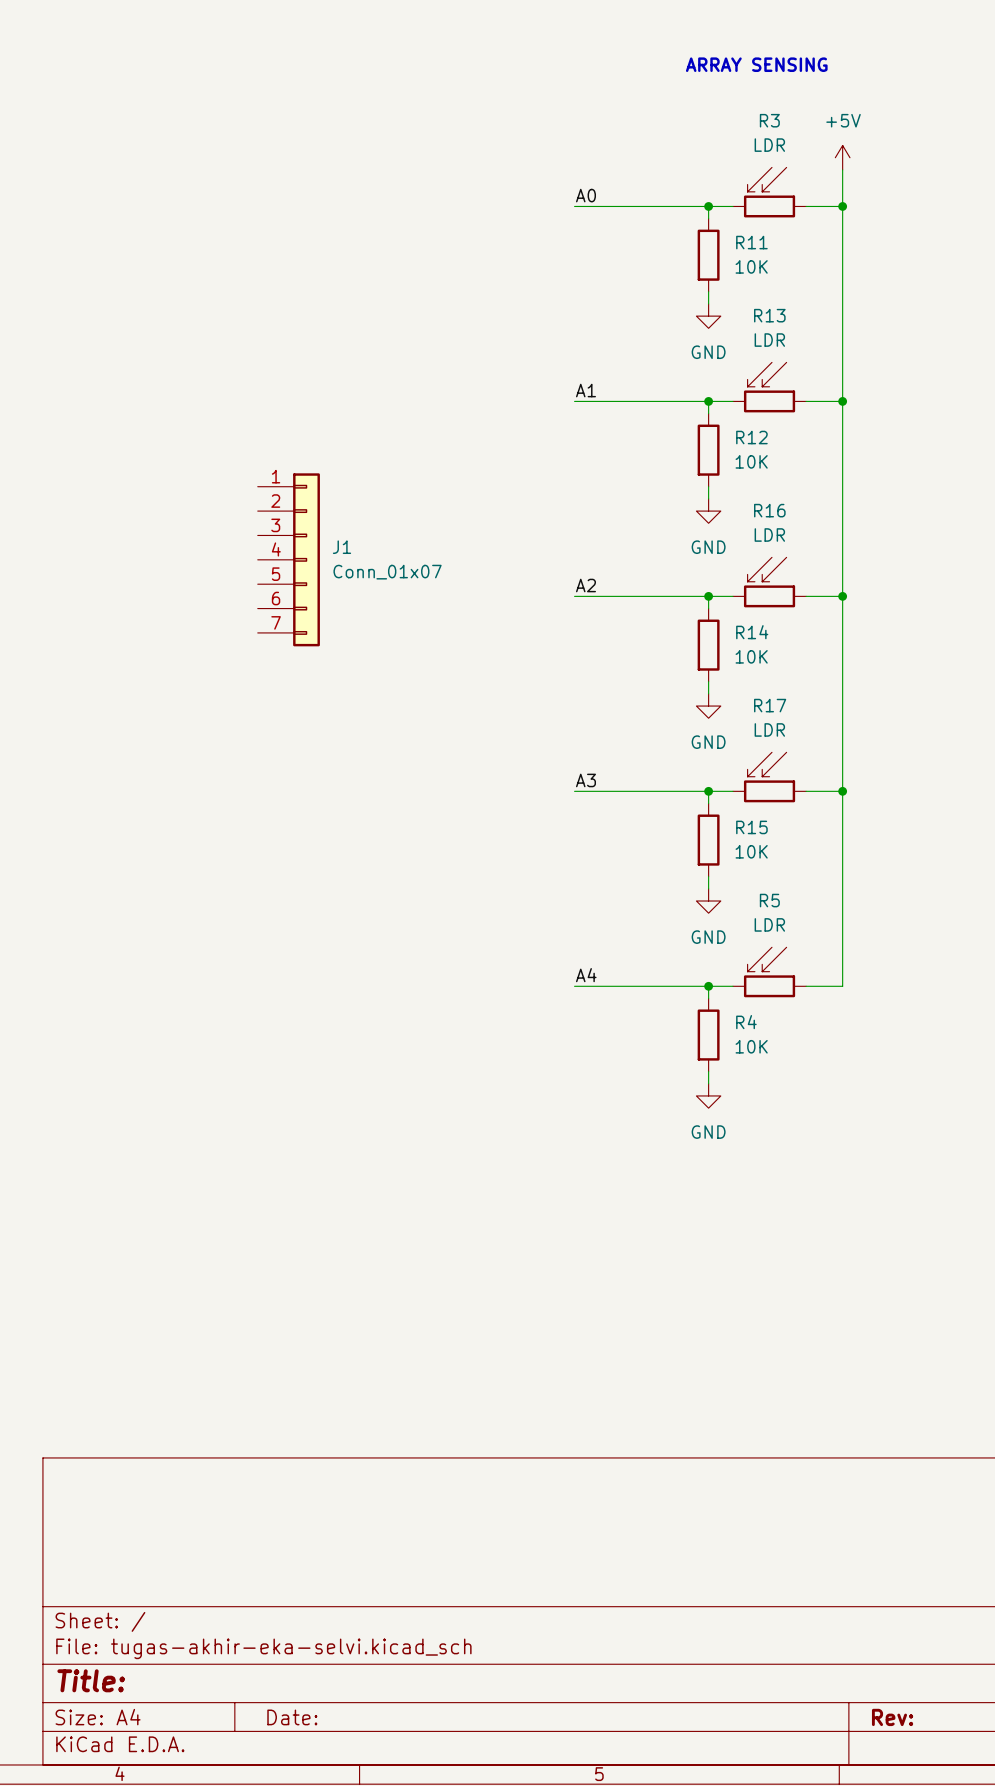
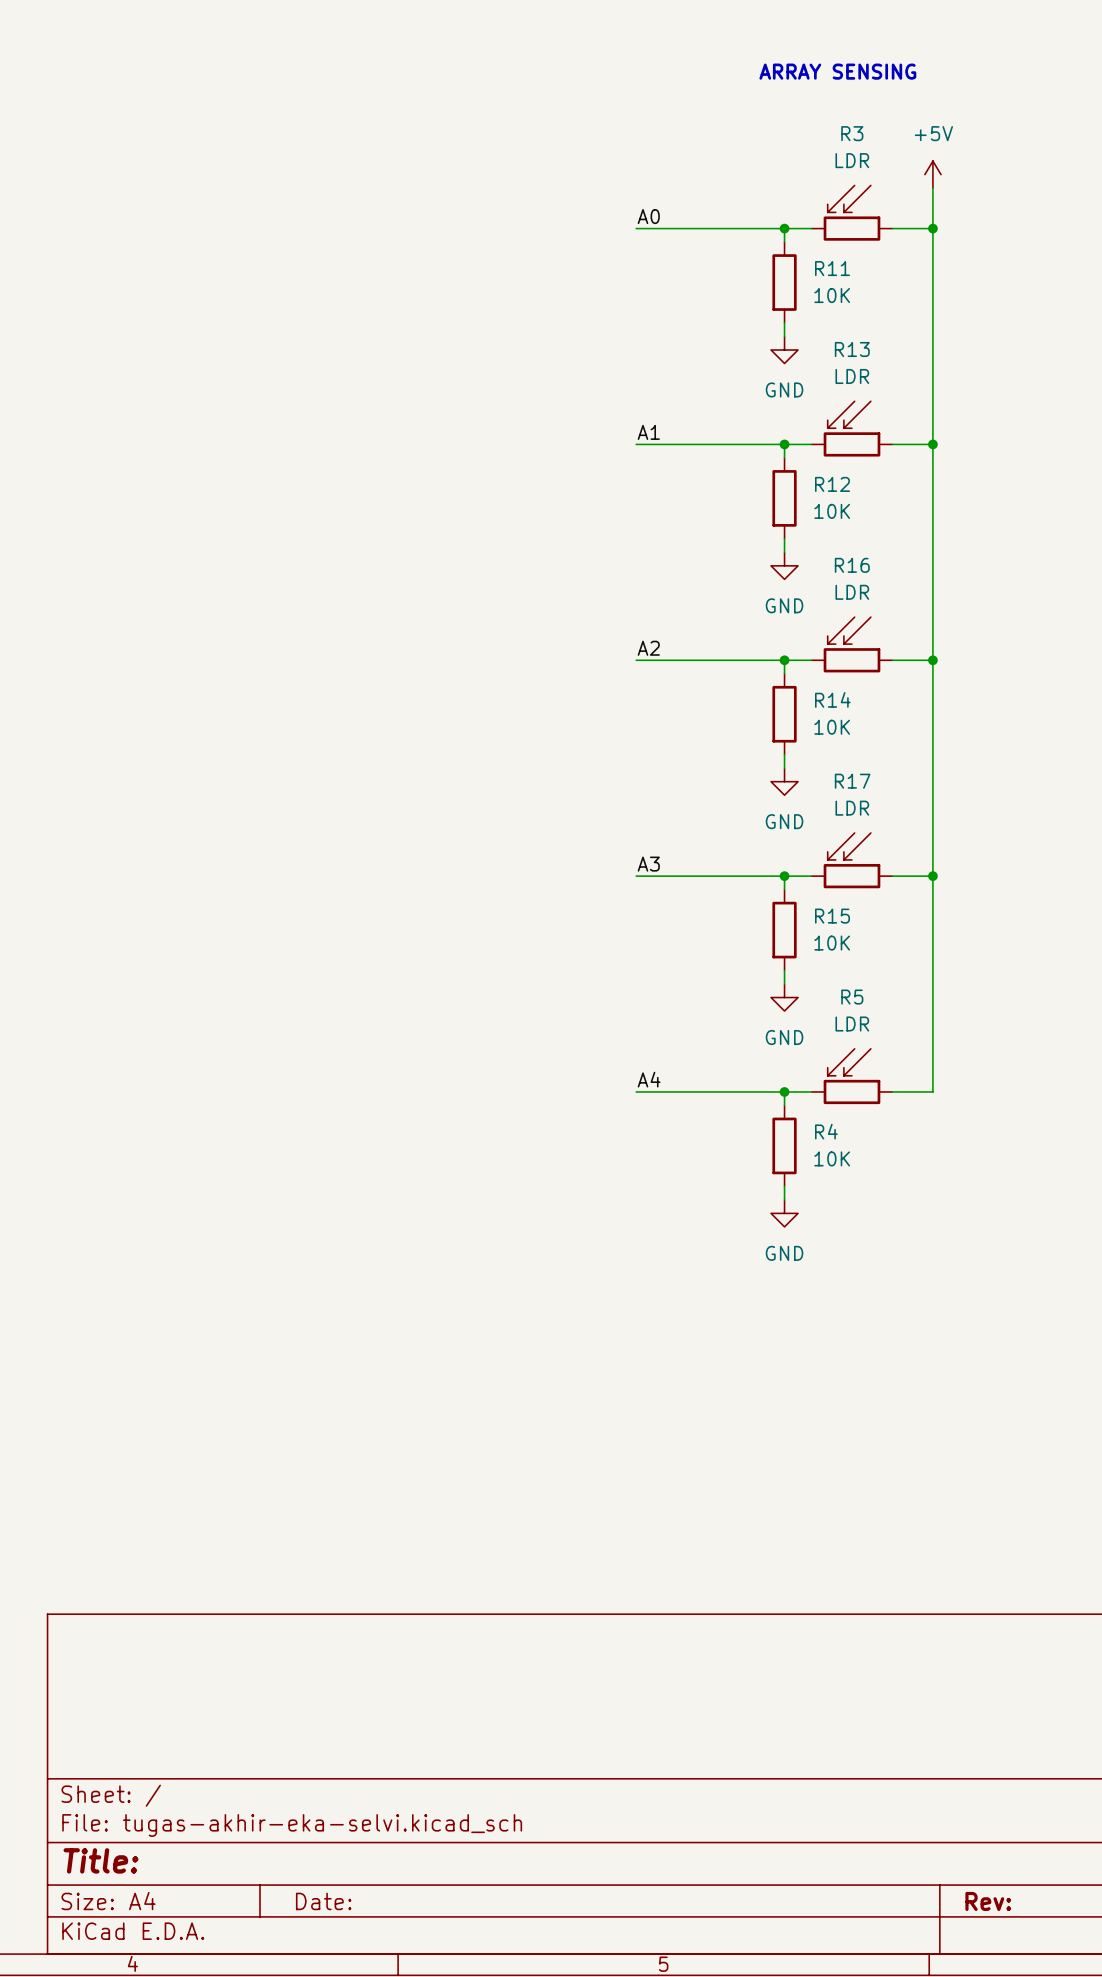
J1: Conn_01x07 (288, 559) -> none

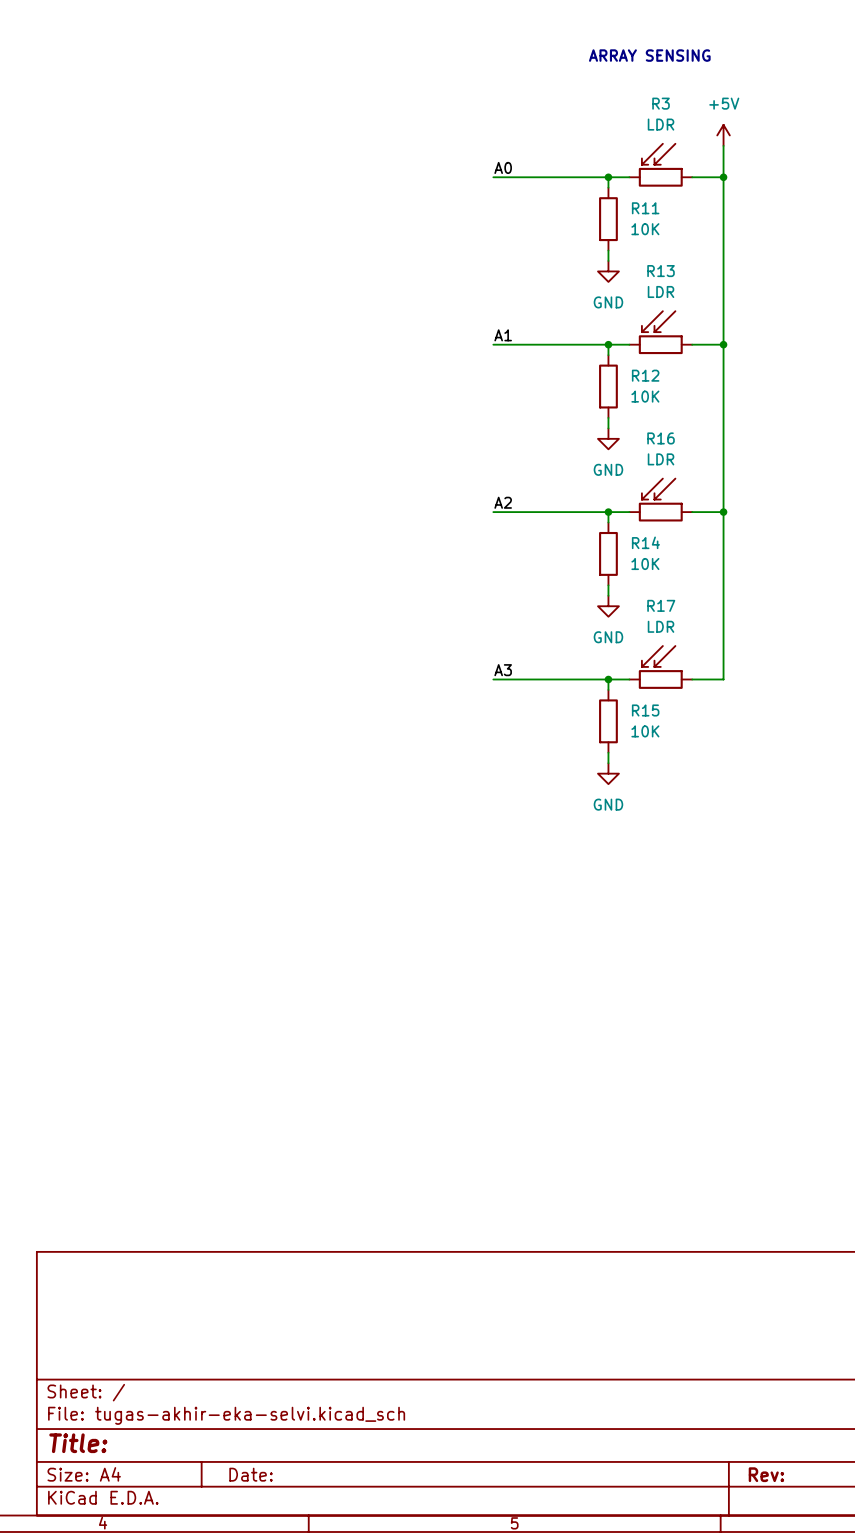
wire: (932, 876) (932, 1091) (892, 1091) -> none
junction: (932, 876) -> none
R5: LDR (851, 1076) -> none
label: A4 (649, 1079) -> none
wire: (636, 1091) (811, 1091) -> none
wire: (784, 1091) (784, 1105) -> none
junction: (784, 1091) -> none
R4: 10K (784, 1145) -> none
wire: (784, 1186) (784, 1199) -> none
power symbol: GND (784, 1213) -> none

